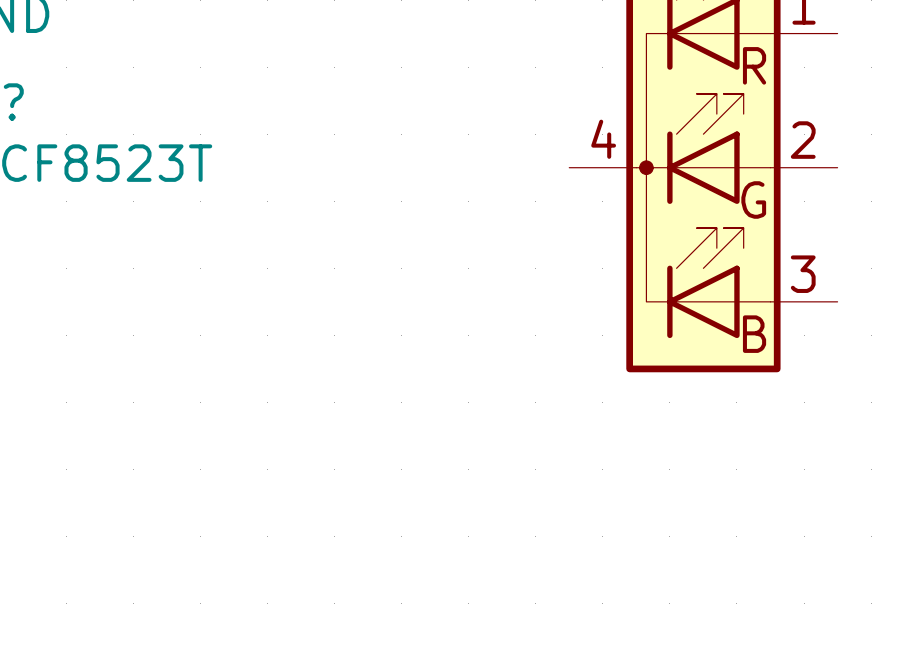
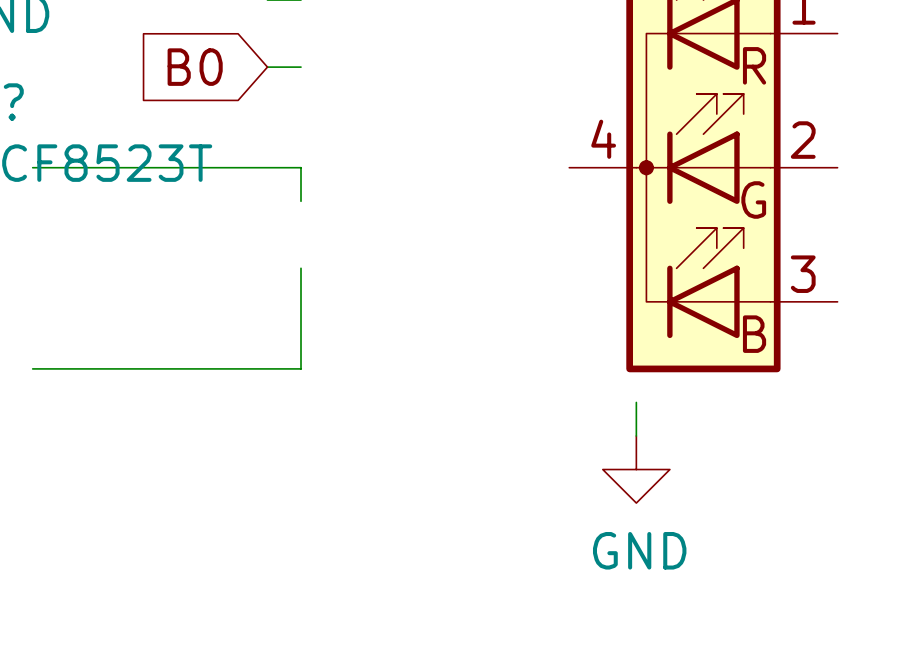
wire: none -> (267, 0) (301, 0)
global label: none -> B0 (195, 67)
wire: none -> (267, 67) (301, 67)
wire: none -> (32, 167) (301, 167) (301, 201)
wire: none -> (301, 268) (301, 368) (32, 368)
wire: none -> (636, 402) (636, 435)
power symbol: none -> GND (636, 469)

